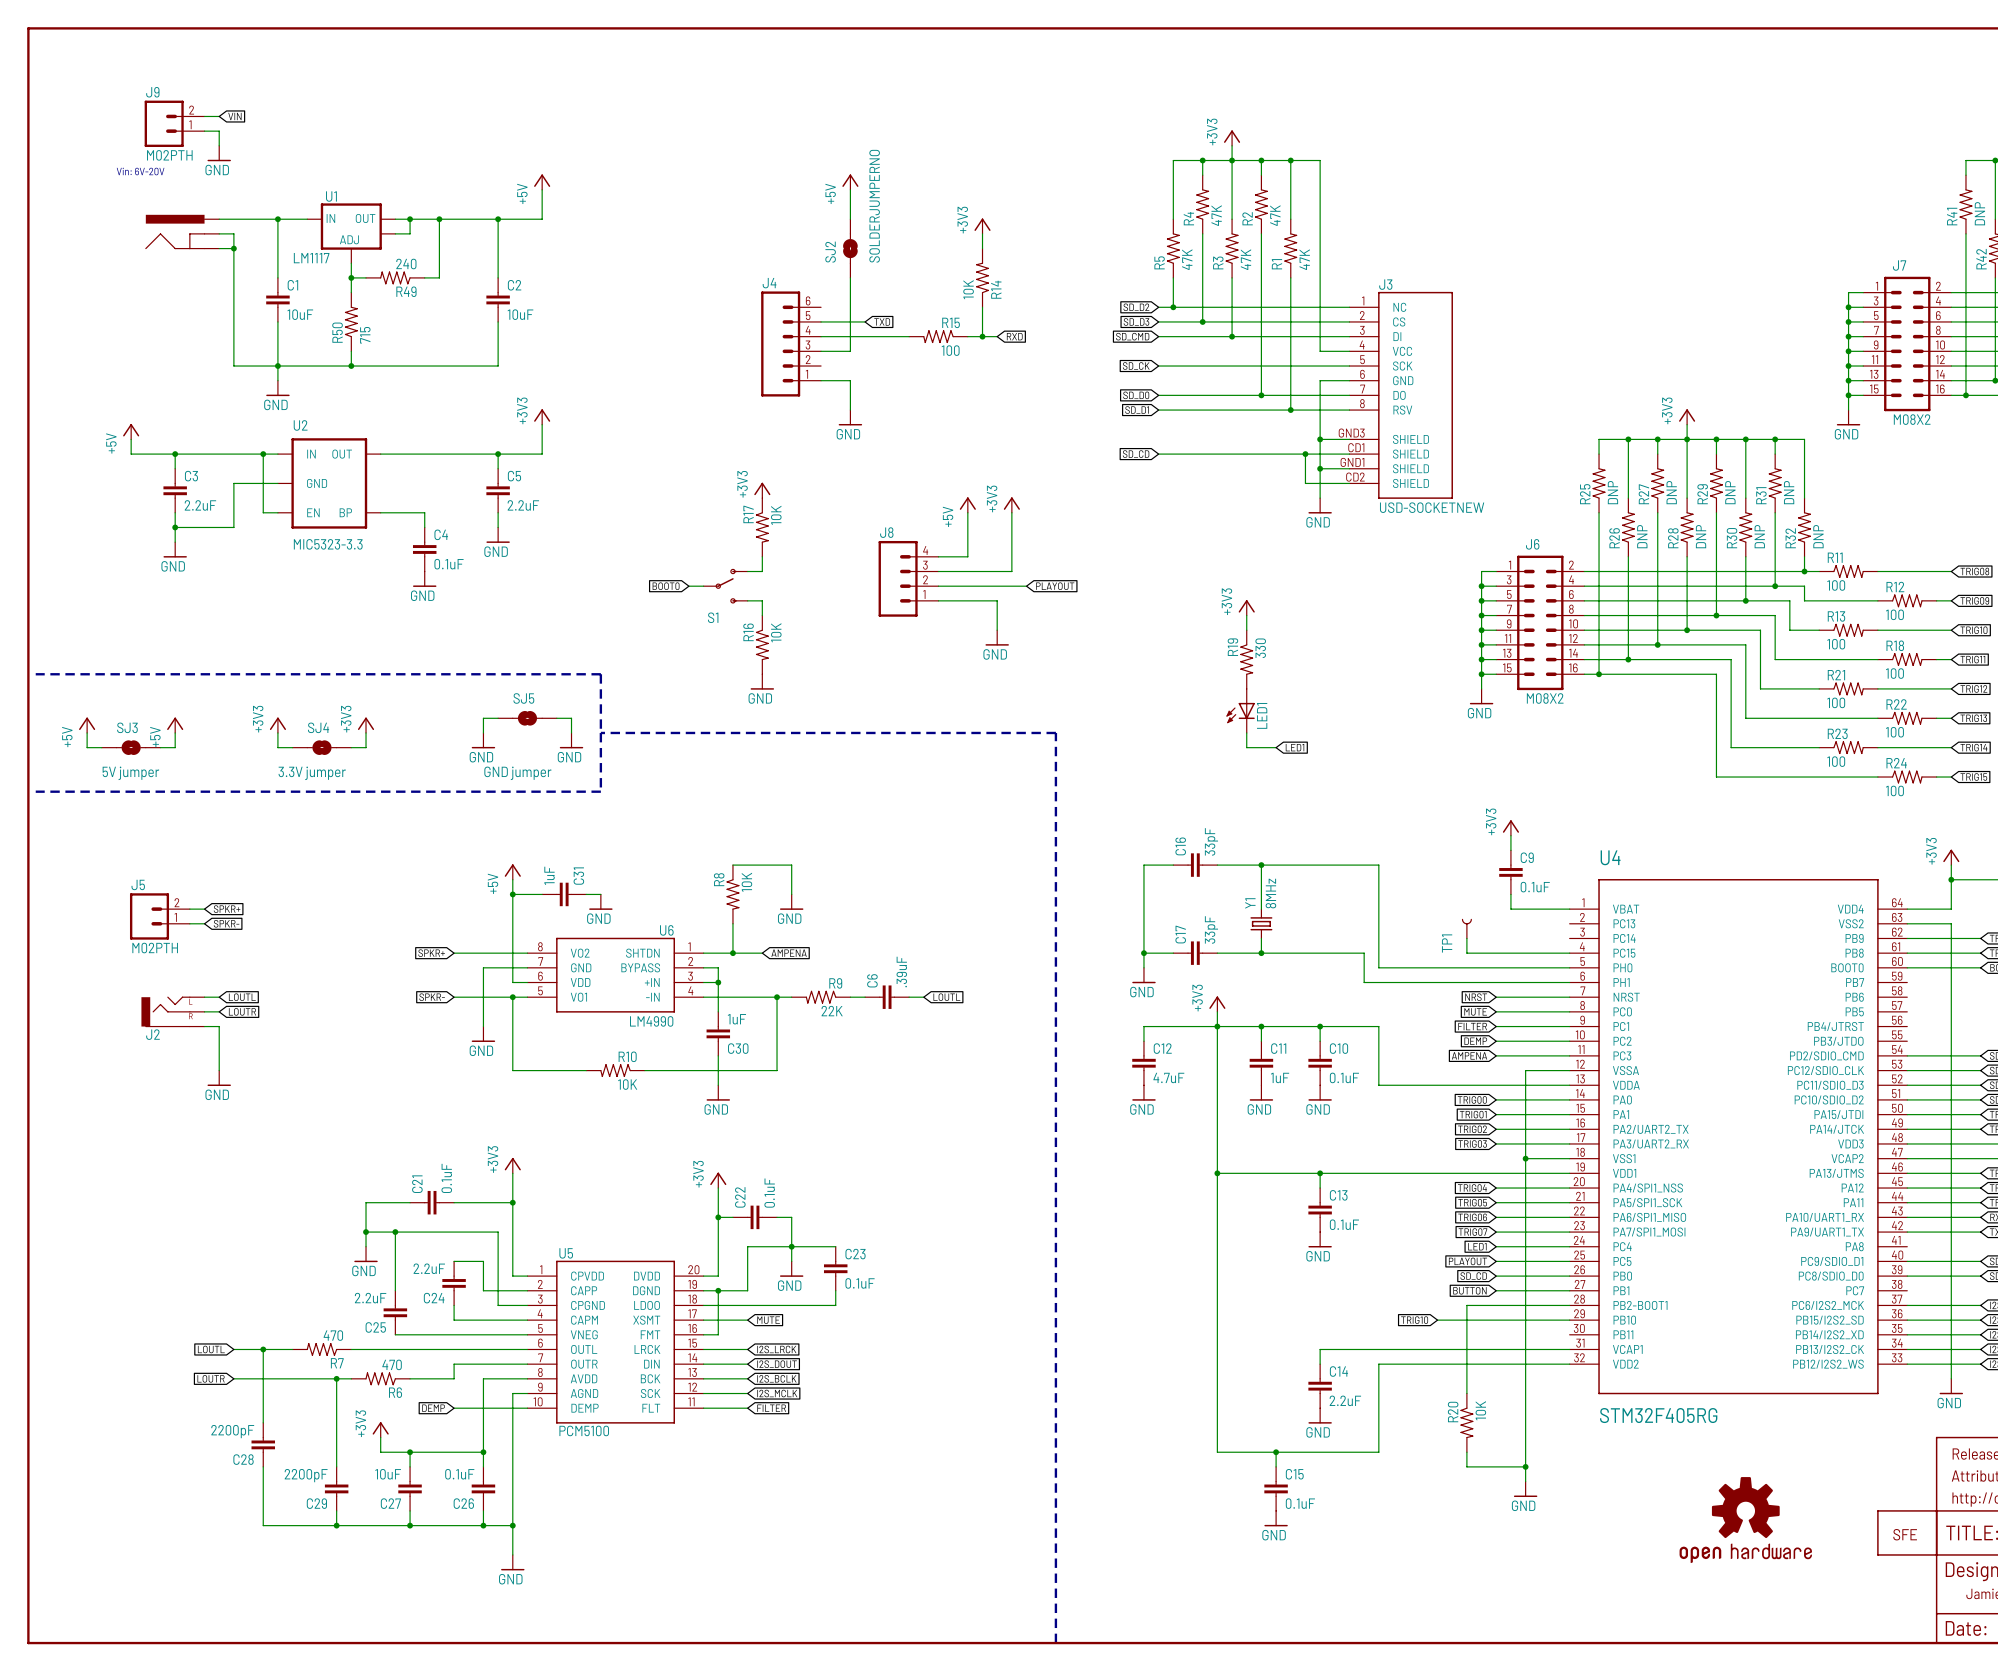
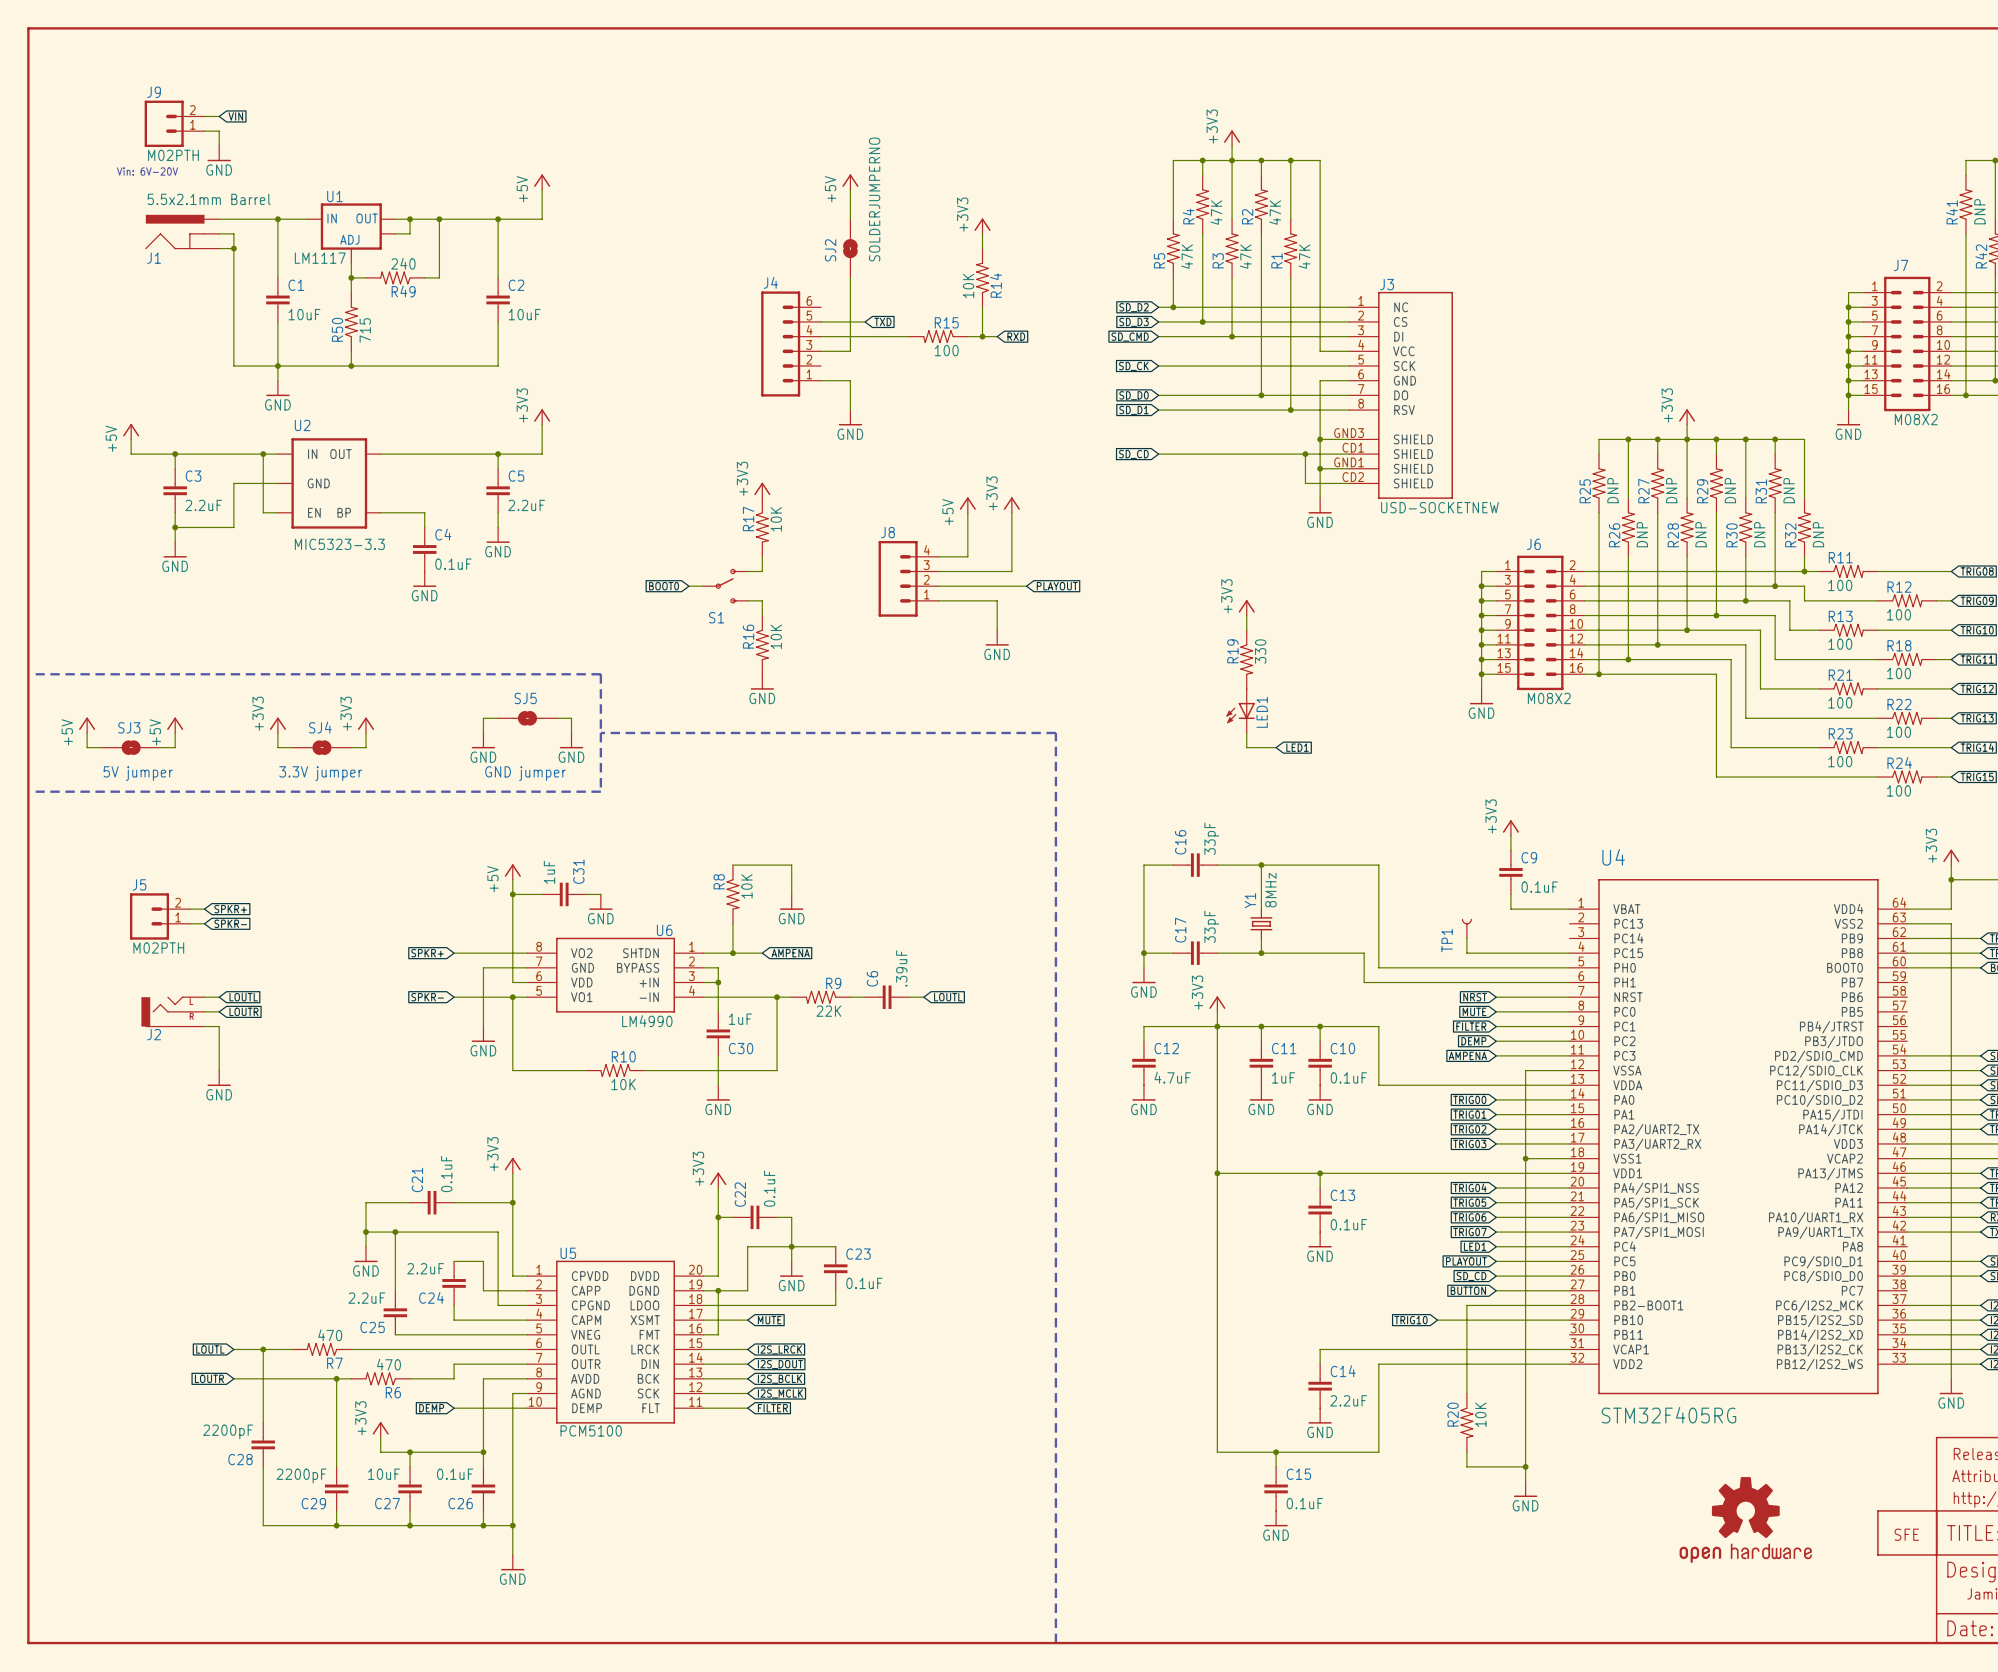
J1 value: none -> 5.5x2.1mm Barrel (209, 199)
J1 name: none -> J1 (154, 258)

